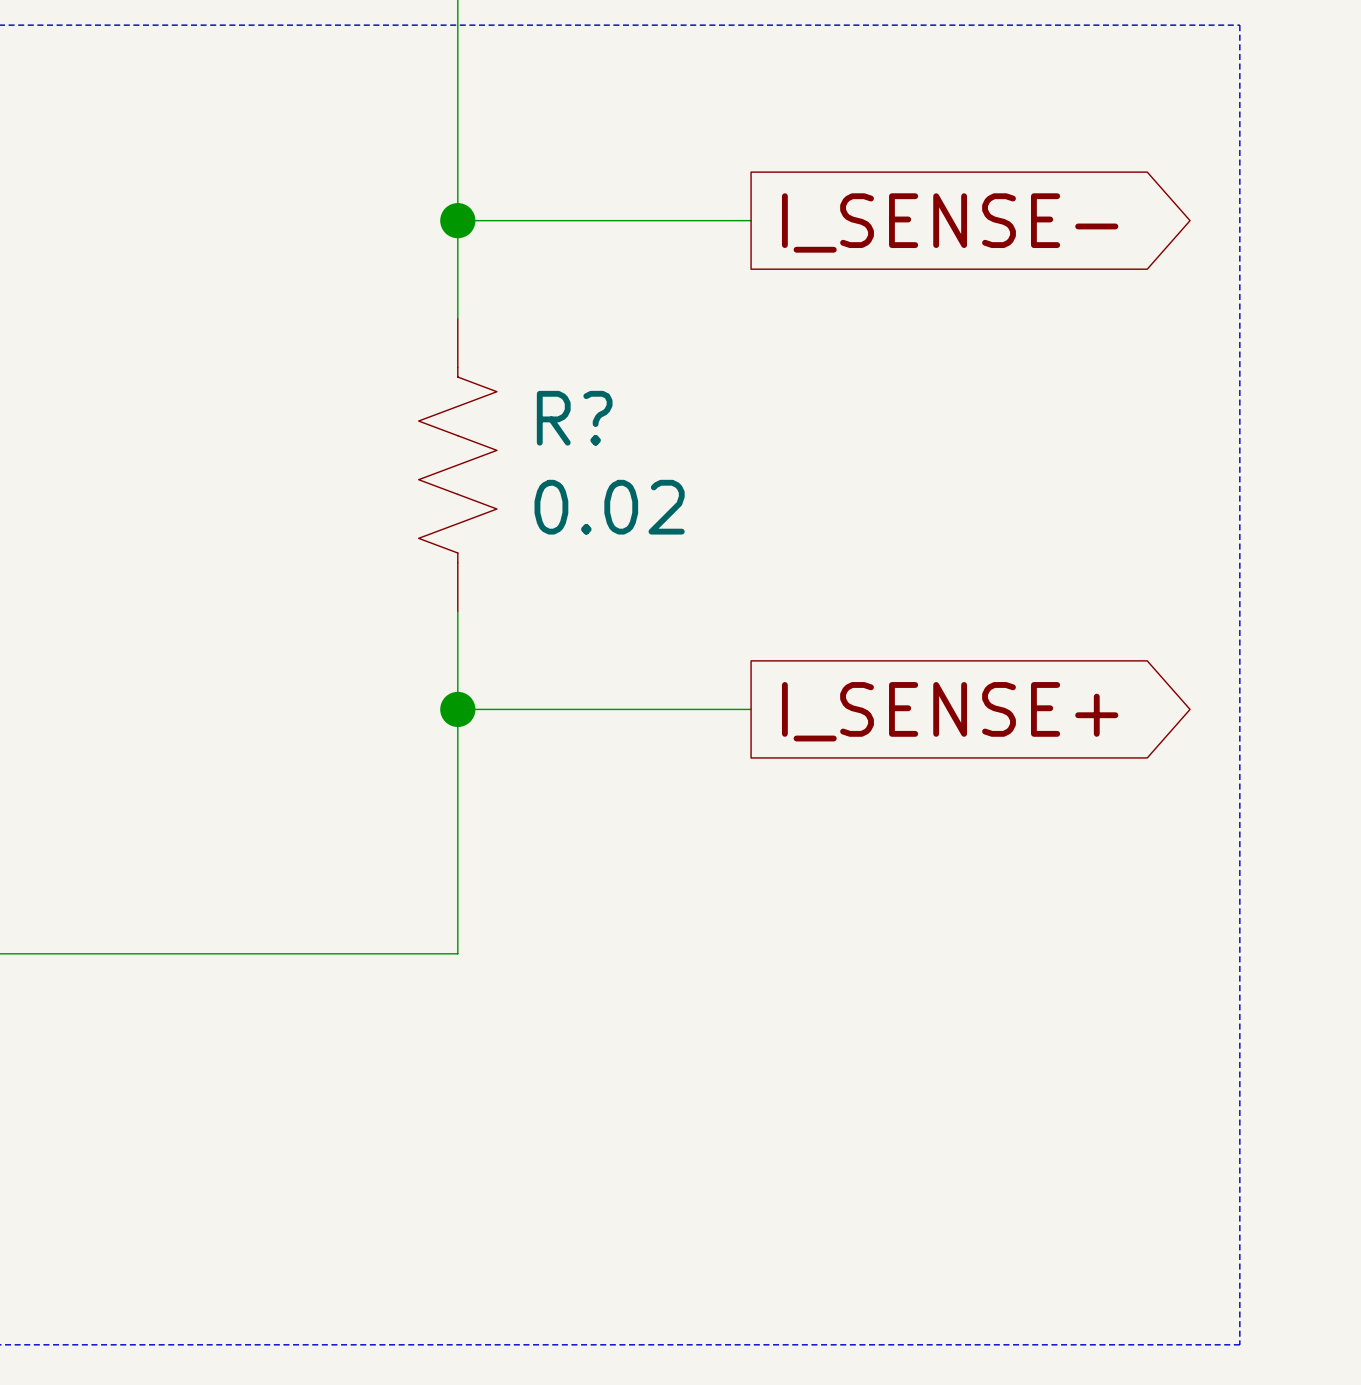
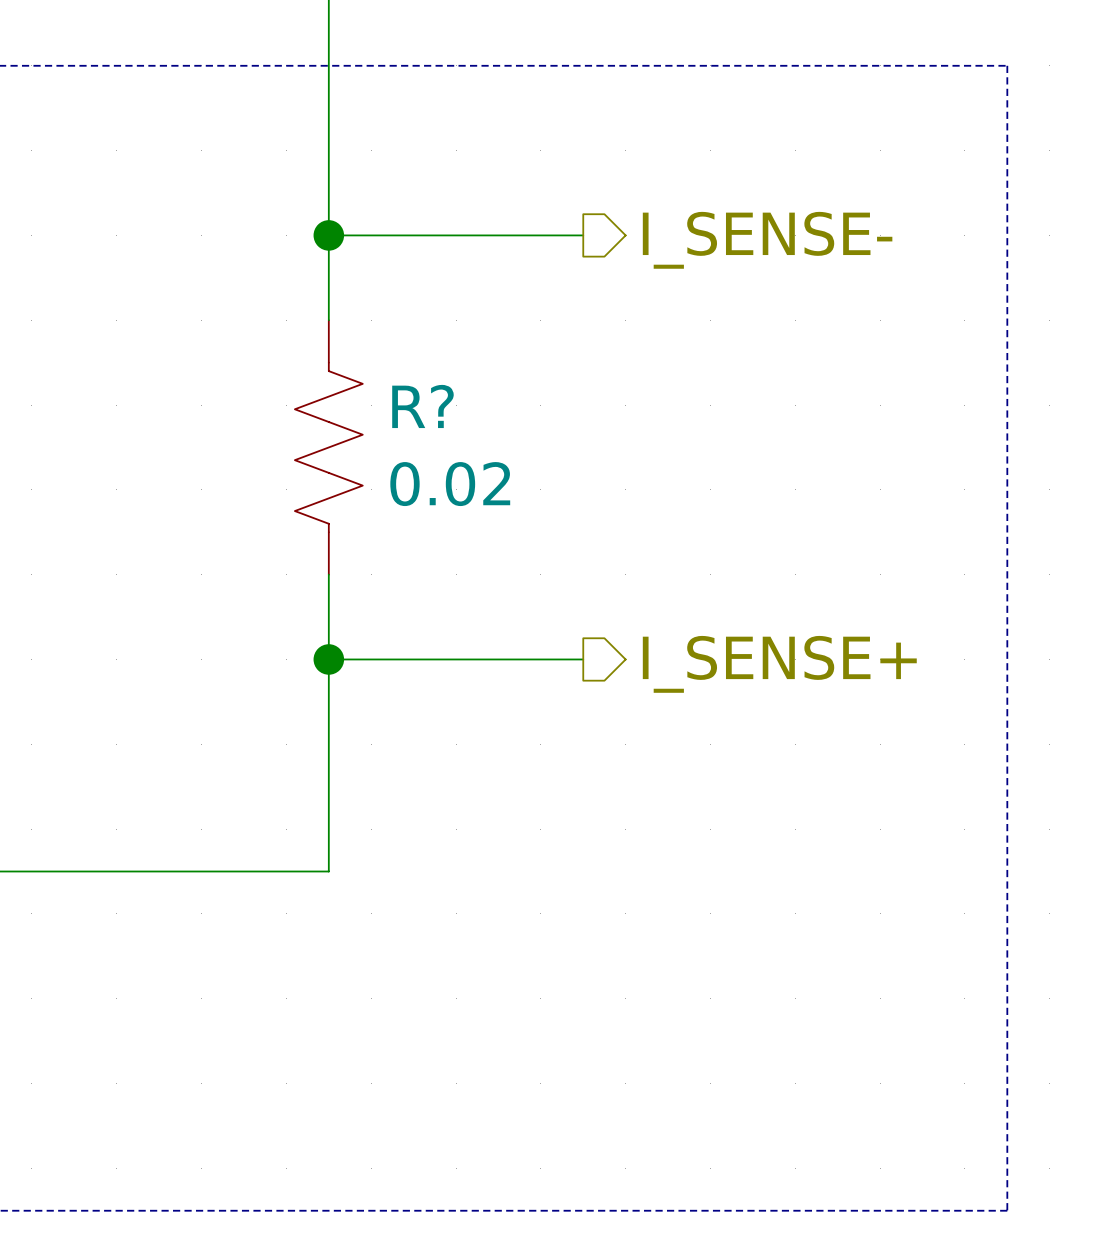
hierarchical label: none -> I_SENSE- (767, 240)
global label: I_SENSE- (950, 222) -> none
hierarchical label: none -> I_SENSE+ (779, 664)
global label: I_SENSE+ (950, 711) -> none

